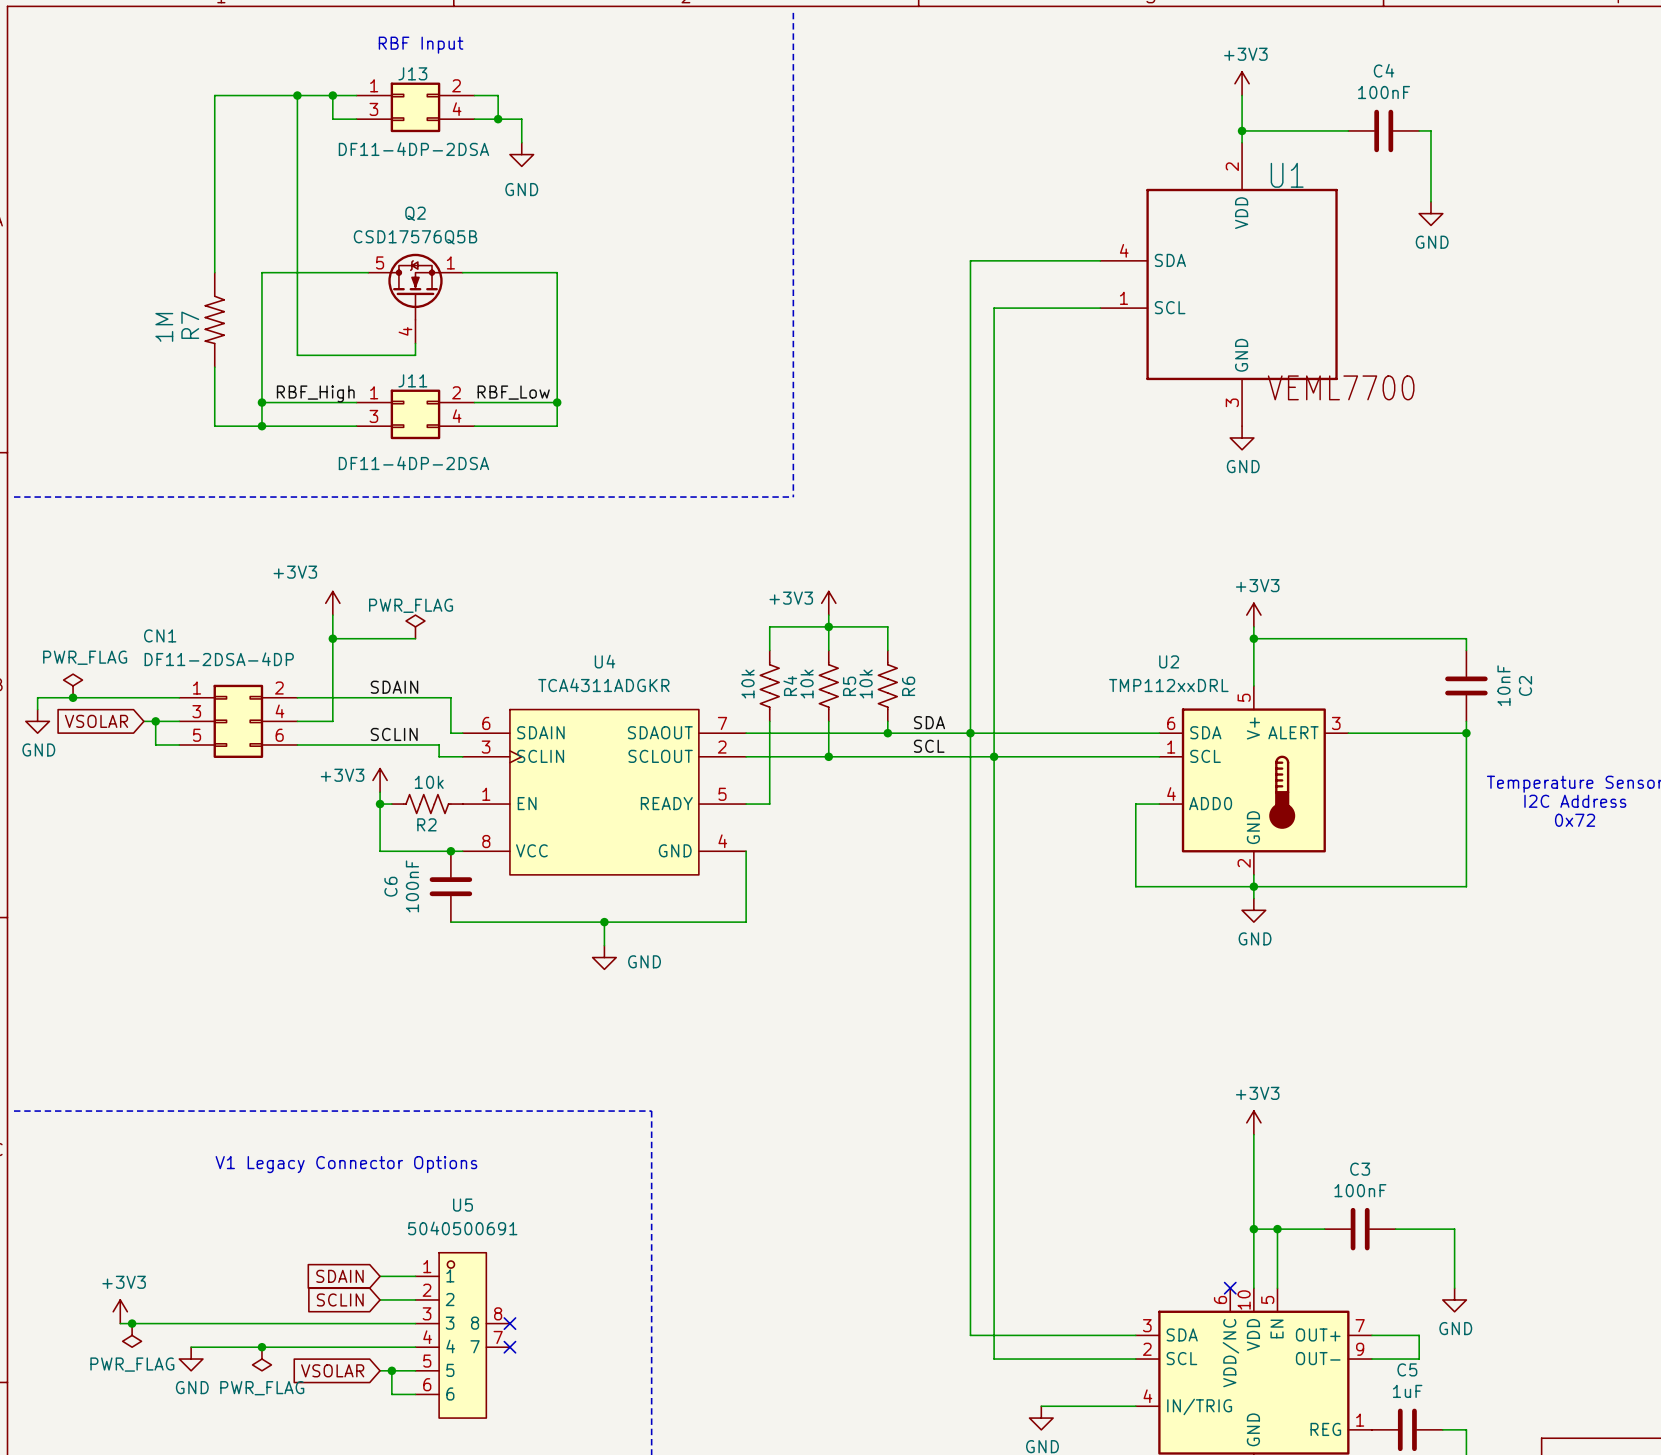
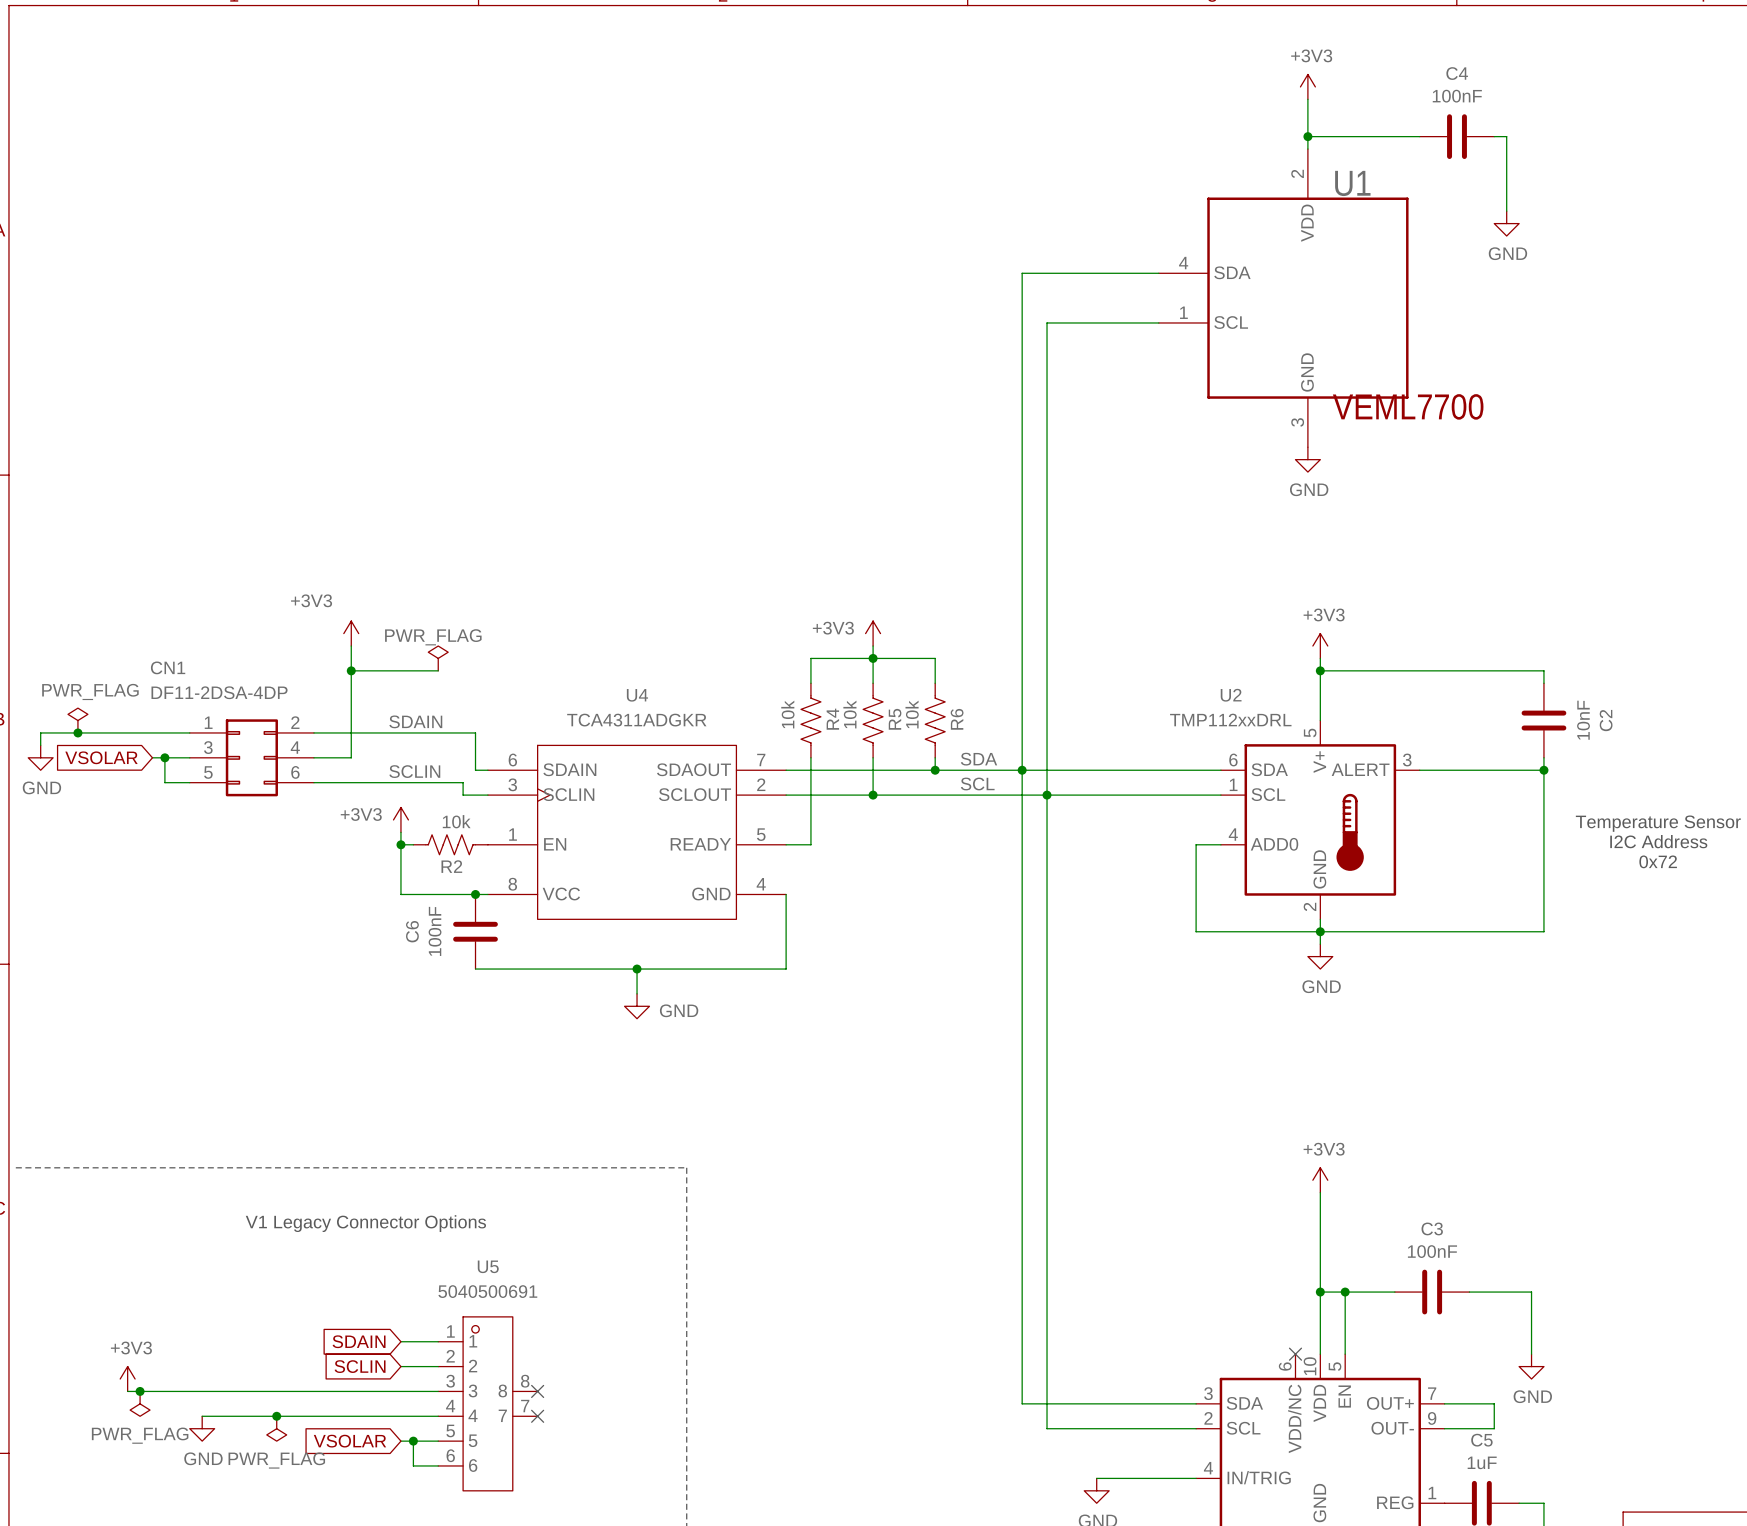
line: (793, 12) (793, 497) (14, 497) -> none
text: RBF Input (421, 45) -> none
wire: (297, 95) (297, 355) (415, 355) (415, 343) -> none
junction: (297, 95) -> none
wire: (332, 95) (332, 119) (356, 119) -> none
junction: (332, 95) -> none
wire: (356, 95) (214, 95) (214, 272) -> none
wire: (474, 95) (498, 95) (498, 119) -> none
J13: DF11-4DP-2DSA (415, 107) -> none
wire: (474, 119) (521, 119) (521, 142) -> none
junction: (498, 119) -> none
power symbol: GND (521, 154) -> none
wire: (368, 272) (261, 272) (261, 426) -> none
wire: (462, 272) (557, 272) (557, 426) (474, 426) -> none
Q2: CSD17576Q5B (415, 298) -> none
R7: 1M (214, 319) -> none
wire: (214, 367) (214, 426) (356, 426) -> none
label: RBF_Low (513, 392) -> none
label: RBF_High (315, 393) -> none
wire: (261, 402) (356, 402) -> none
junction: (261, 402) -> none
wire: (474, 402) (557, 402) -> none
junction: (557, 402) -> none
J11: DF11-4DP-2DSA (415, 414) -> none
junction: (261, 426) -> none

